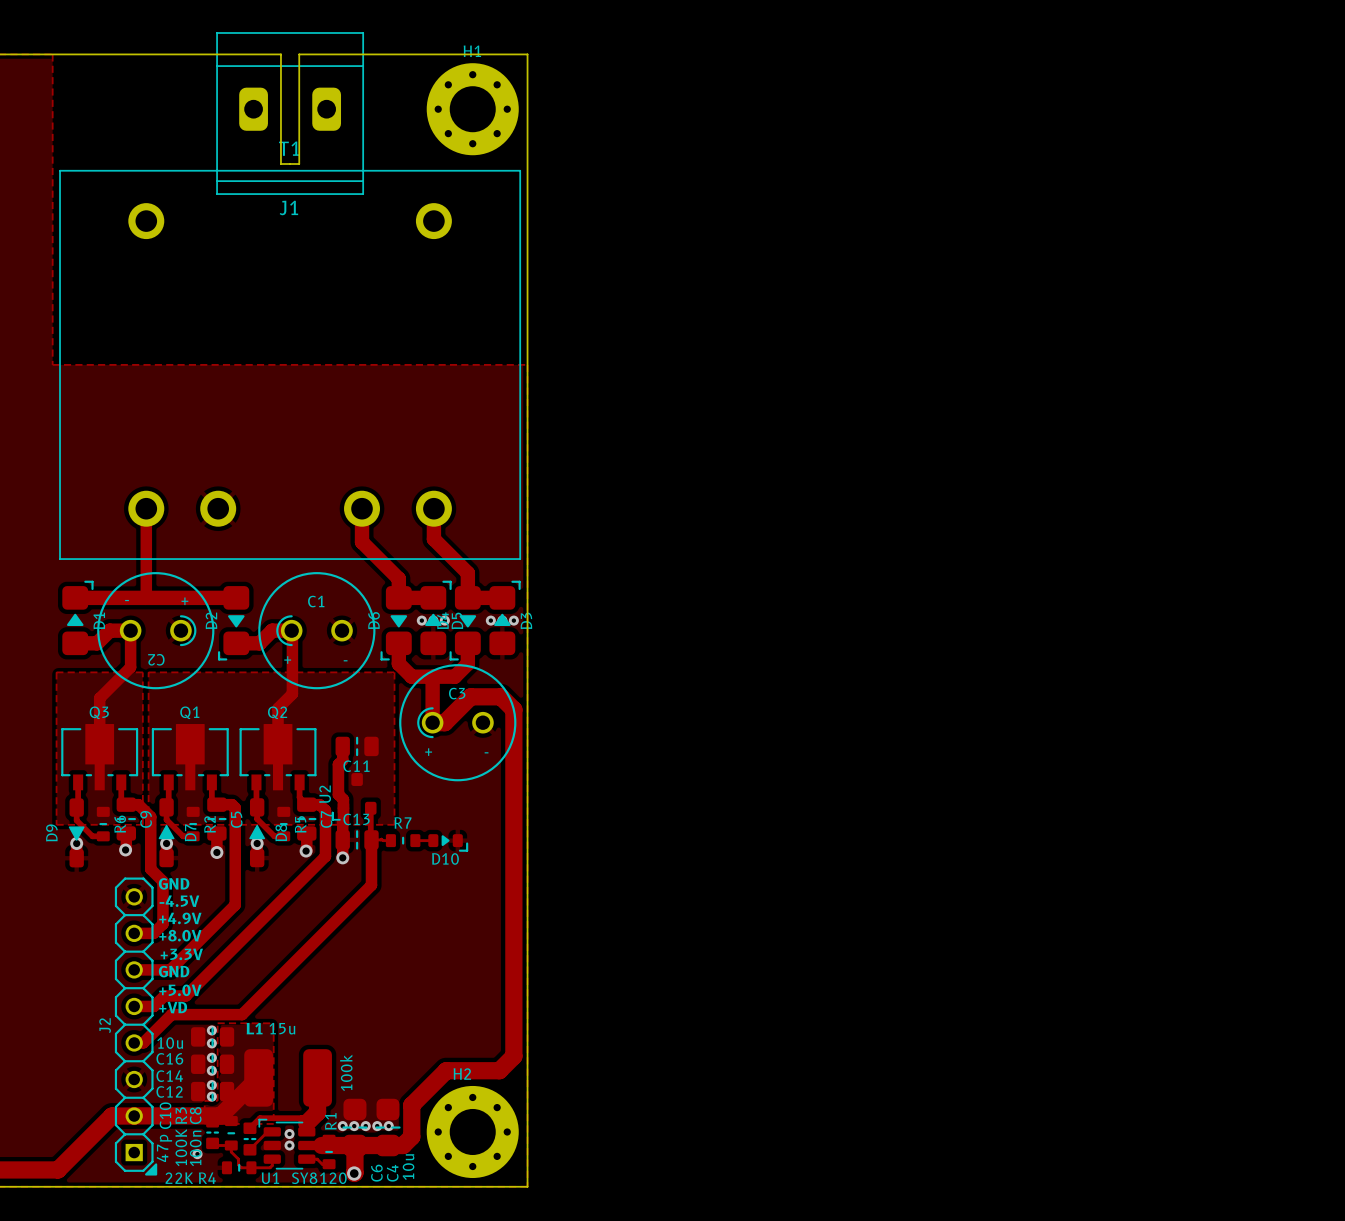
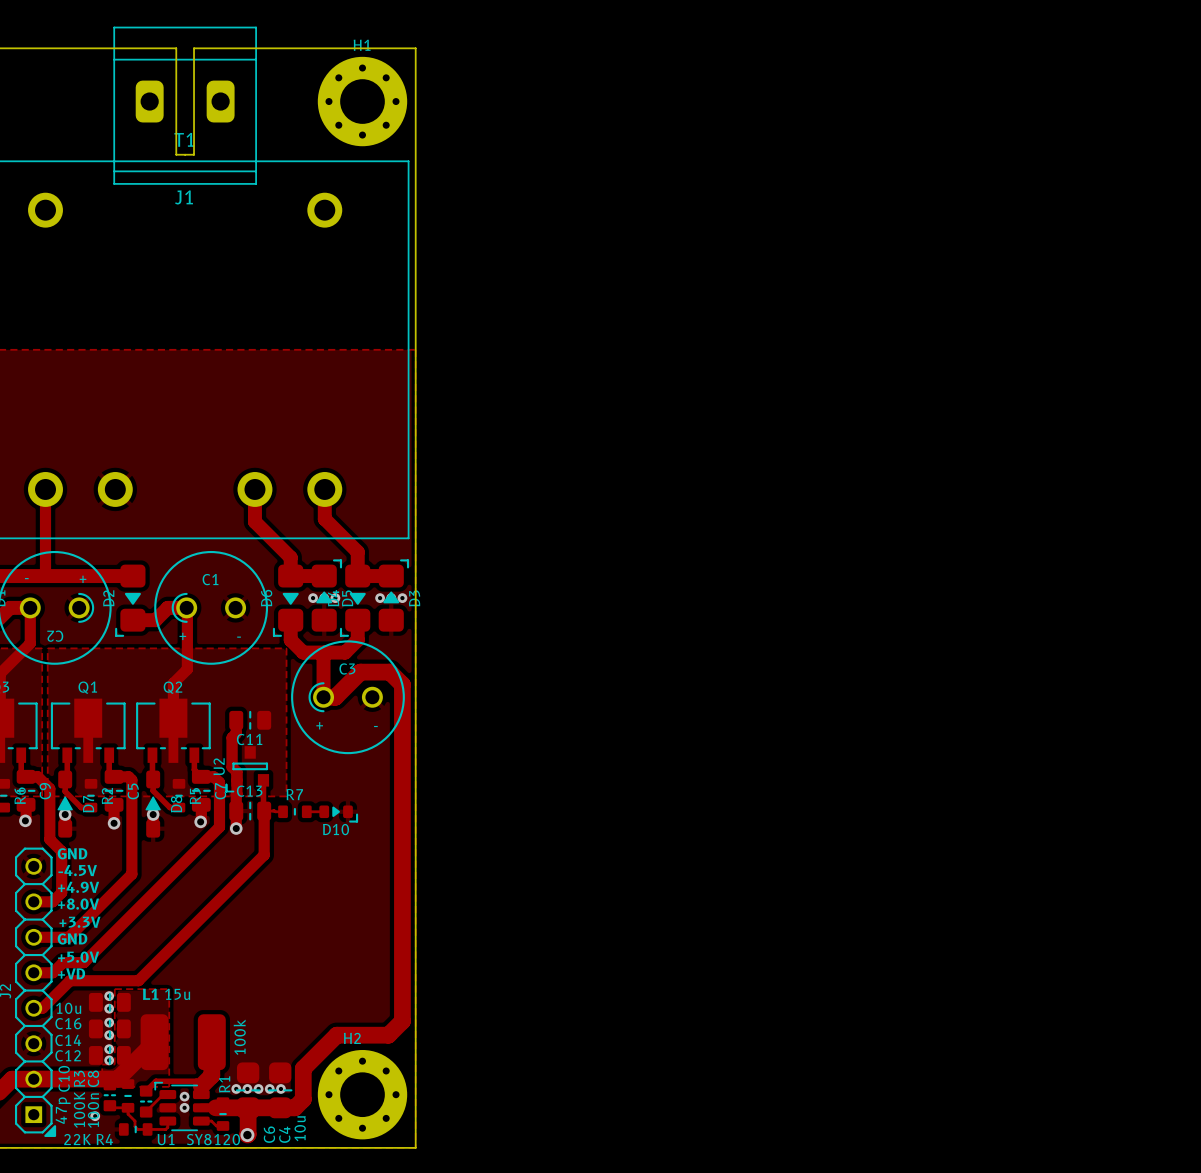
U2 footprint: [331, 773, 377, 821] -> [225, 746, 270, 793]

